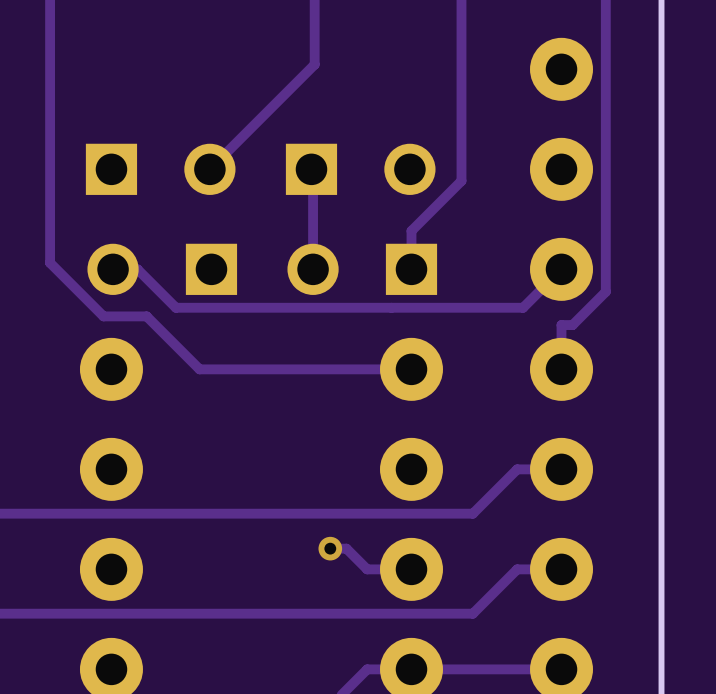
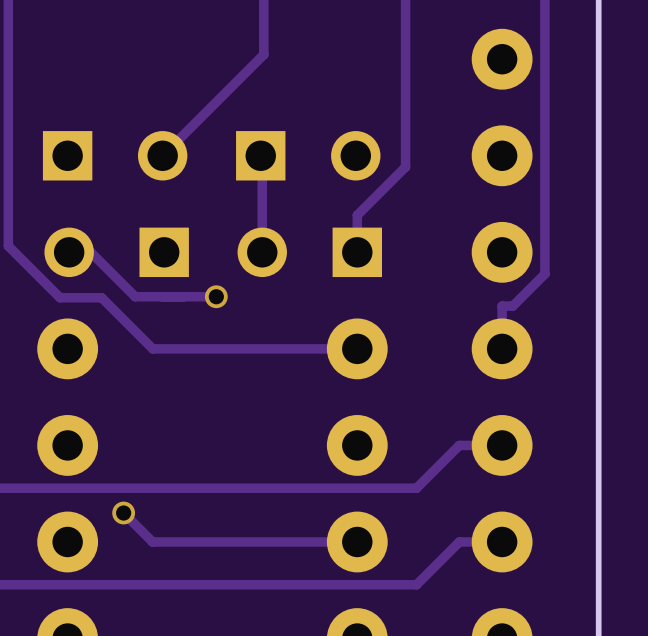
track: (561, 269) (523, 307) (175, 307) (135, 269) -> (216, 296) (135, 296) (90, 252)
via: none -> (216, 296)
via: none -> (123, 513)
track: (330, 548) (346, 548) (367, 569) -> (123, 513) (152, 541) (314, 541)
via: (330, 548) -> none

